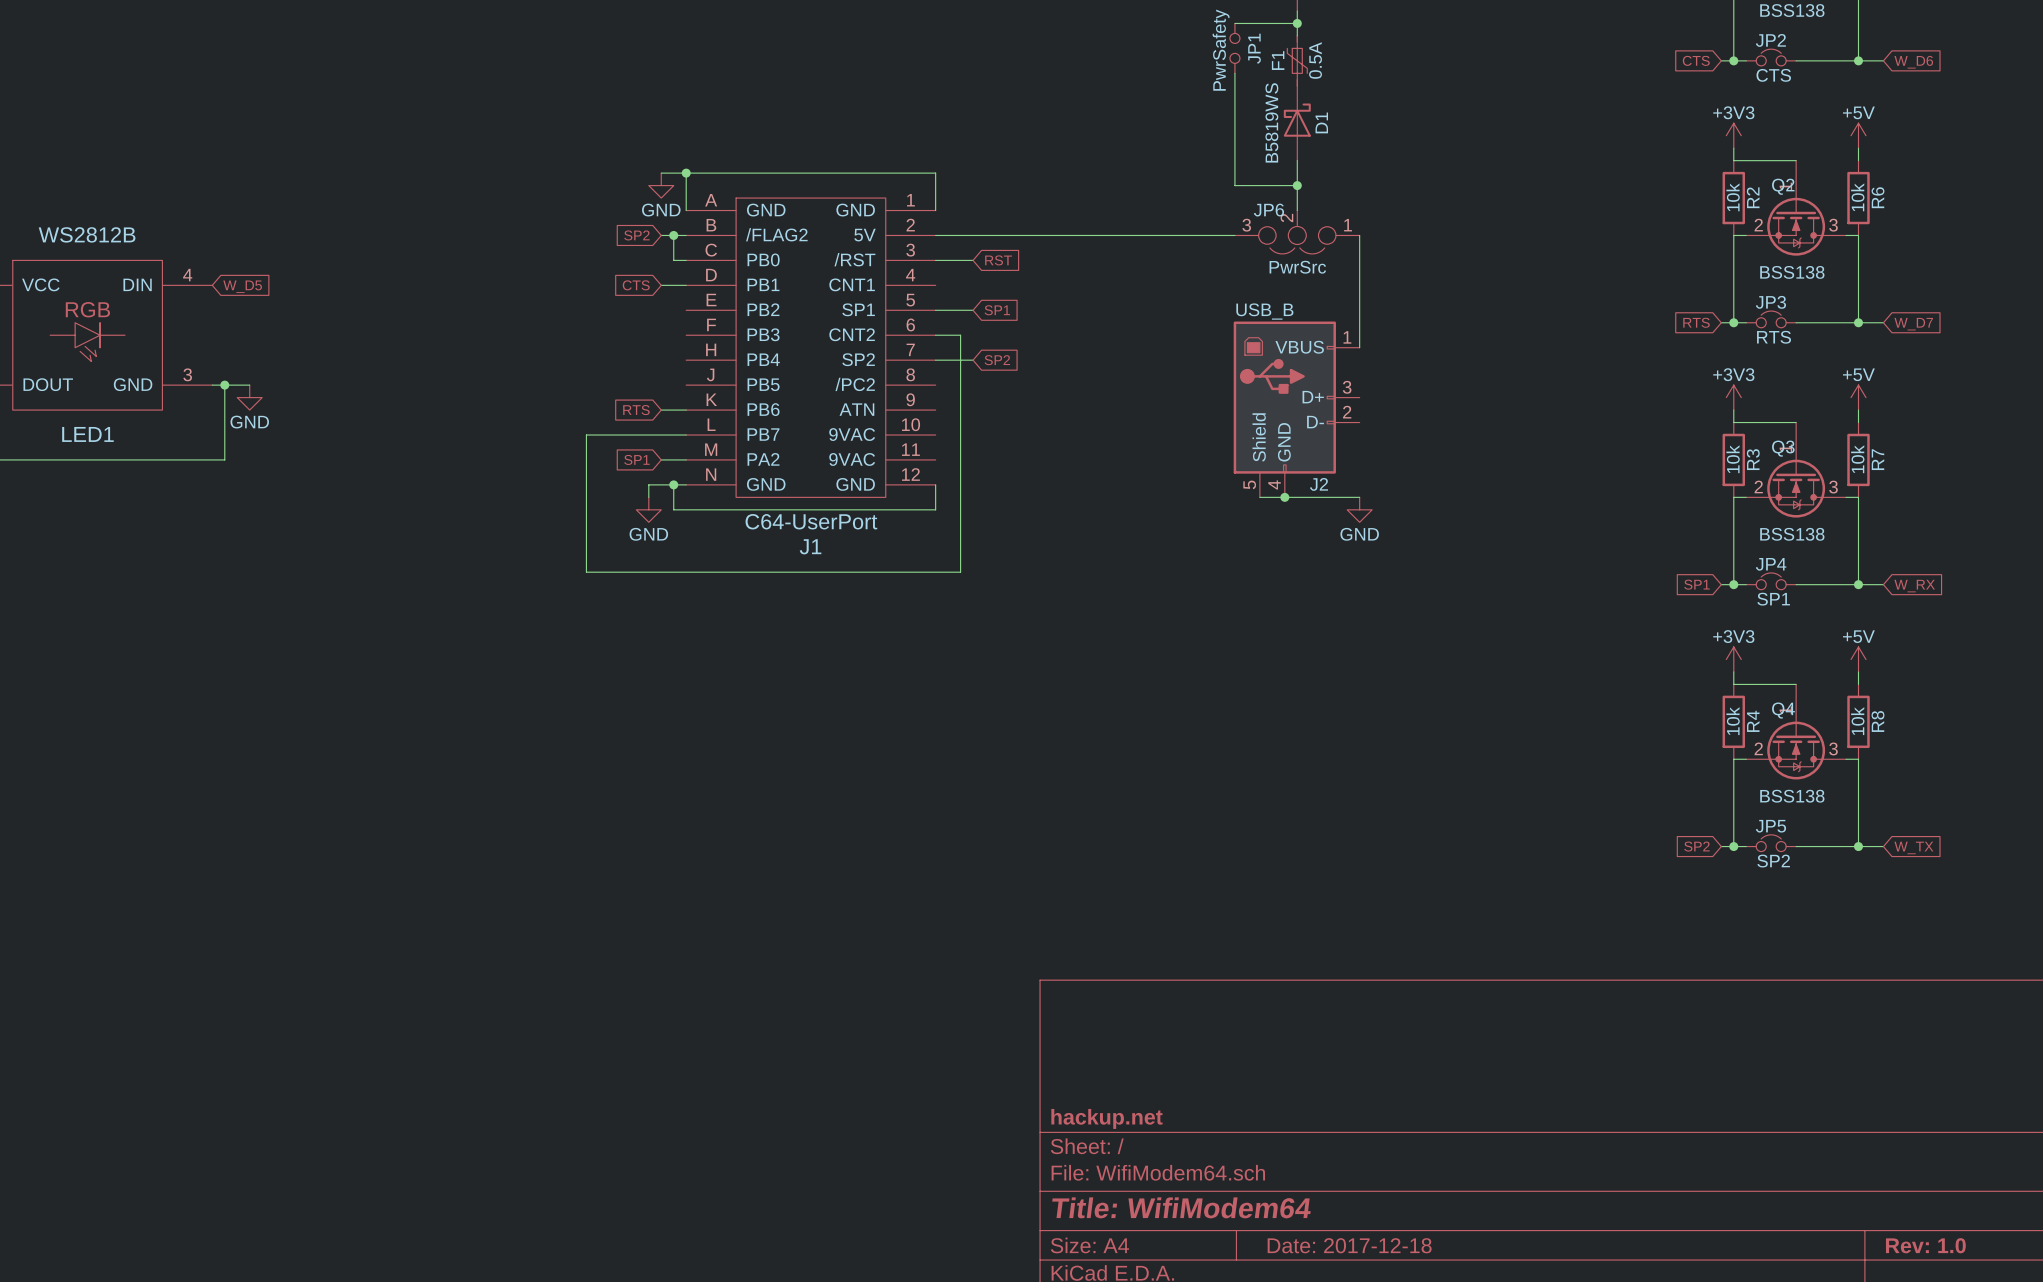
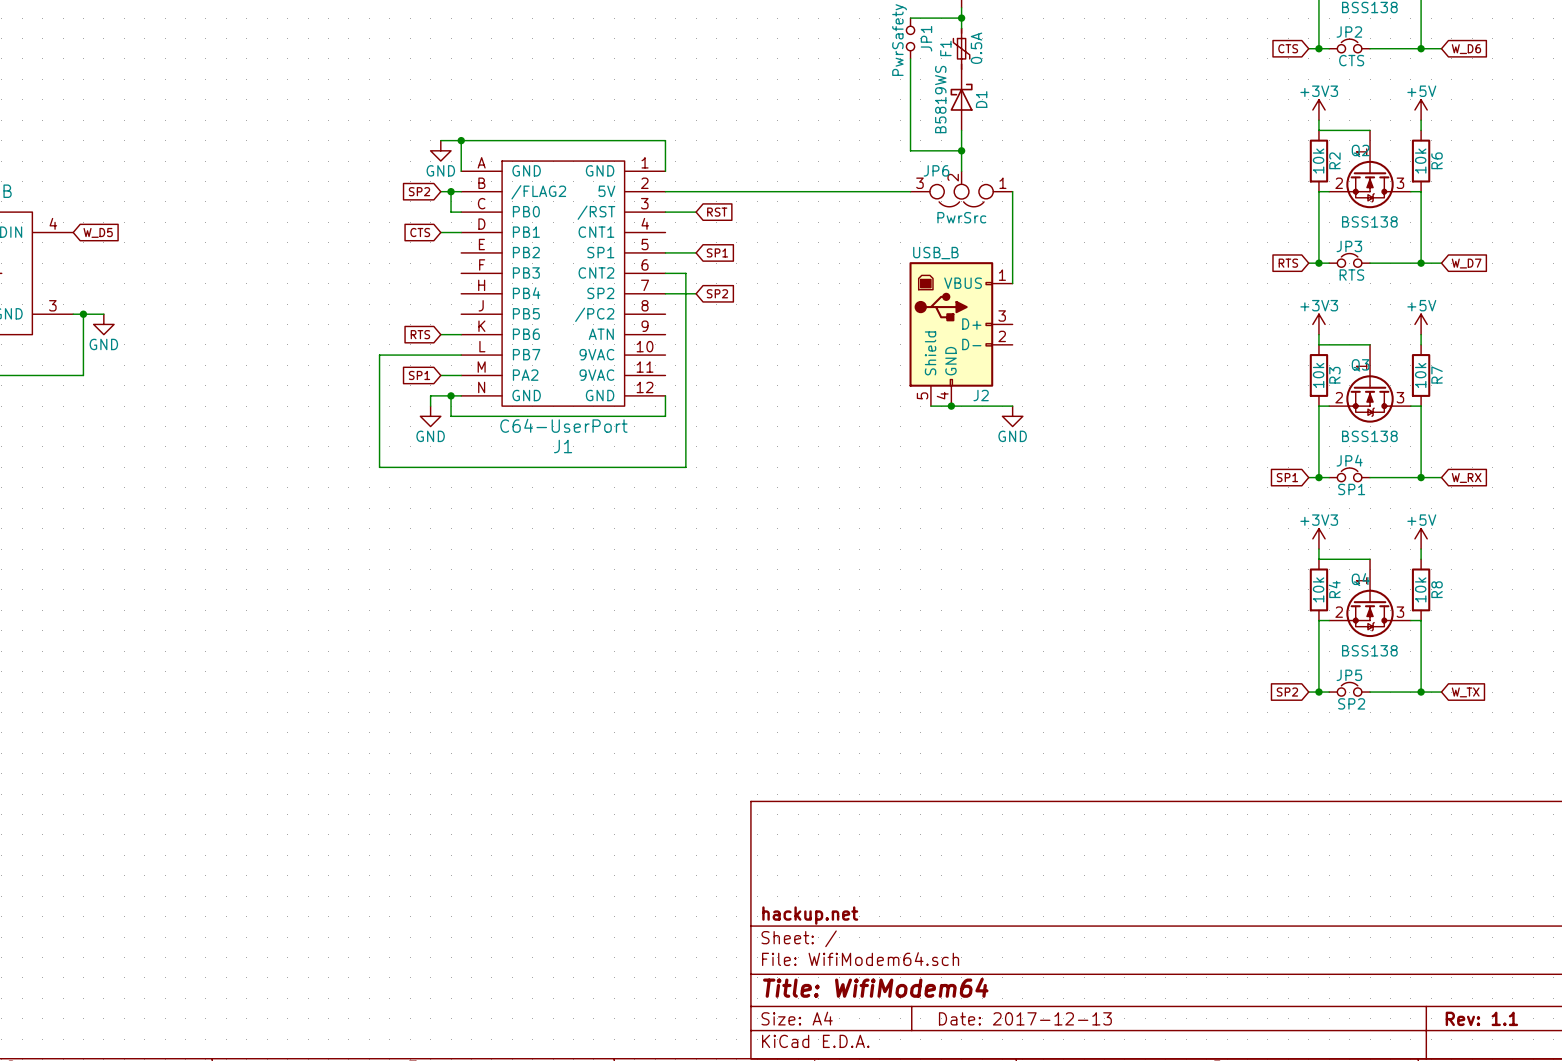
title block: Date: 2017-12-18 (1349, 1245) -> Date: 2017-12-13 (1025, 1018)
title block: Rev: 1.0 (1925, 1245) -> Rev: 1.1 (1481, 1018)

